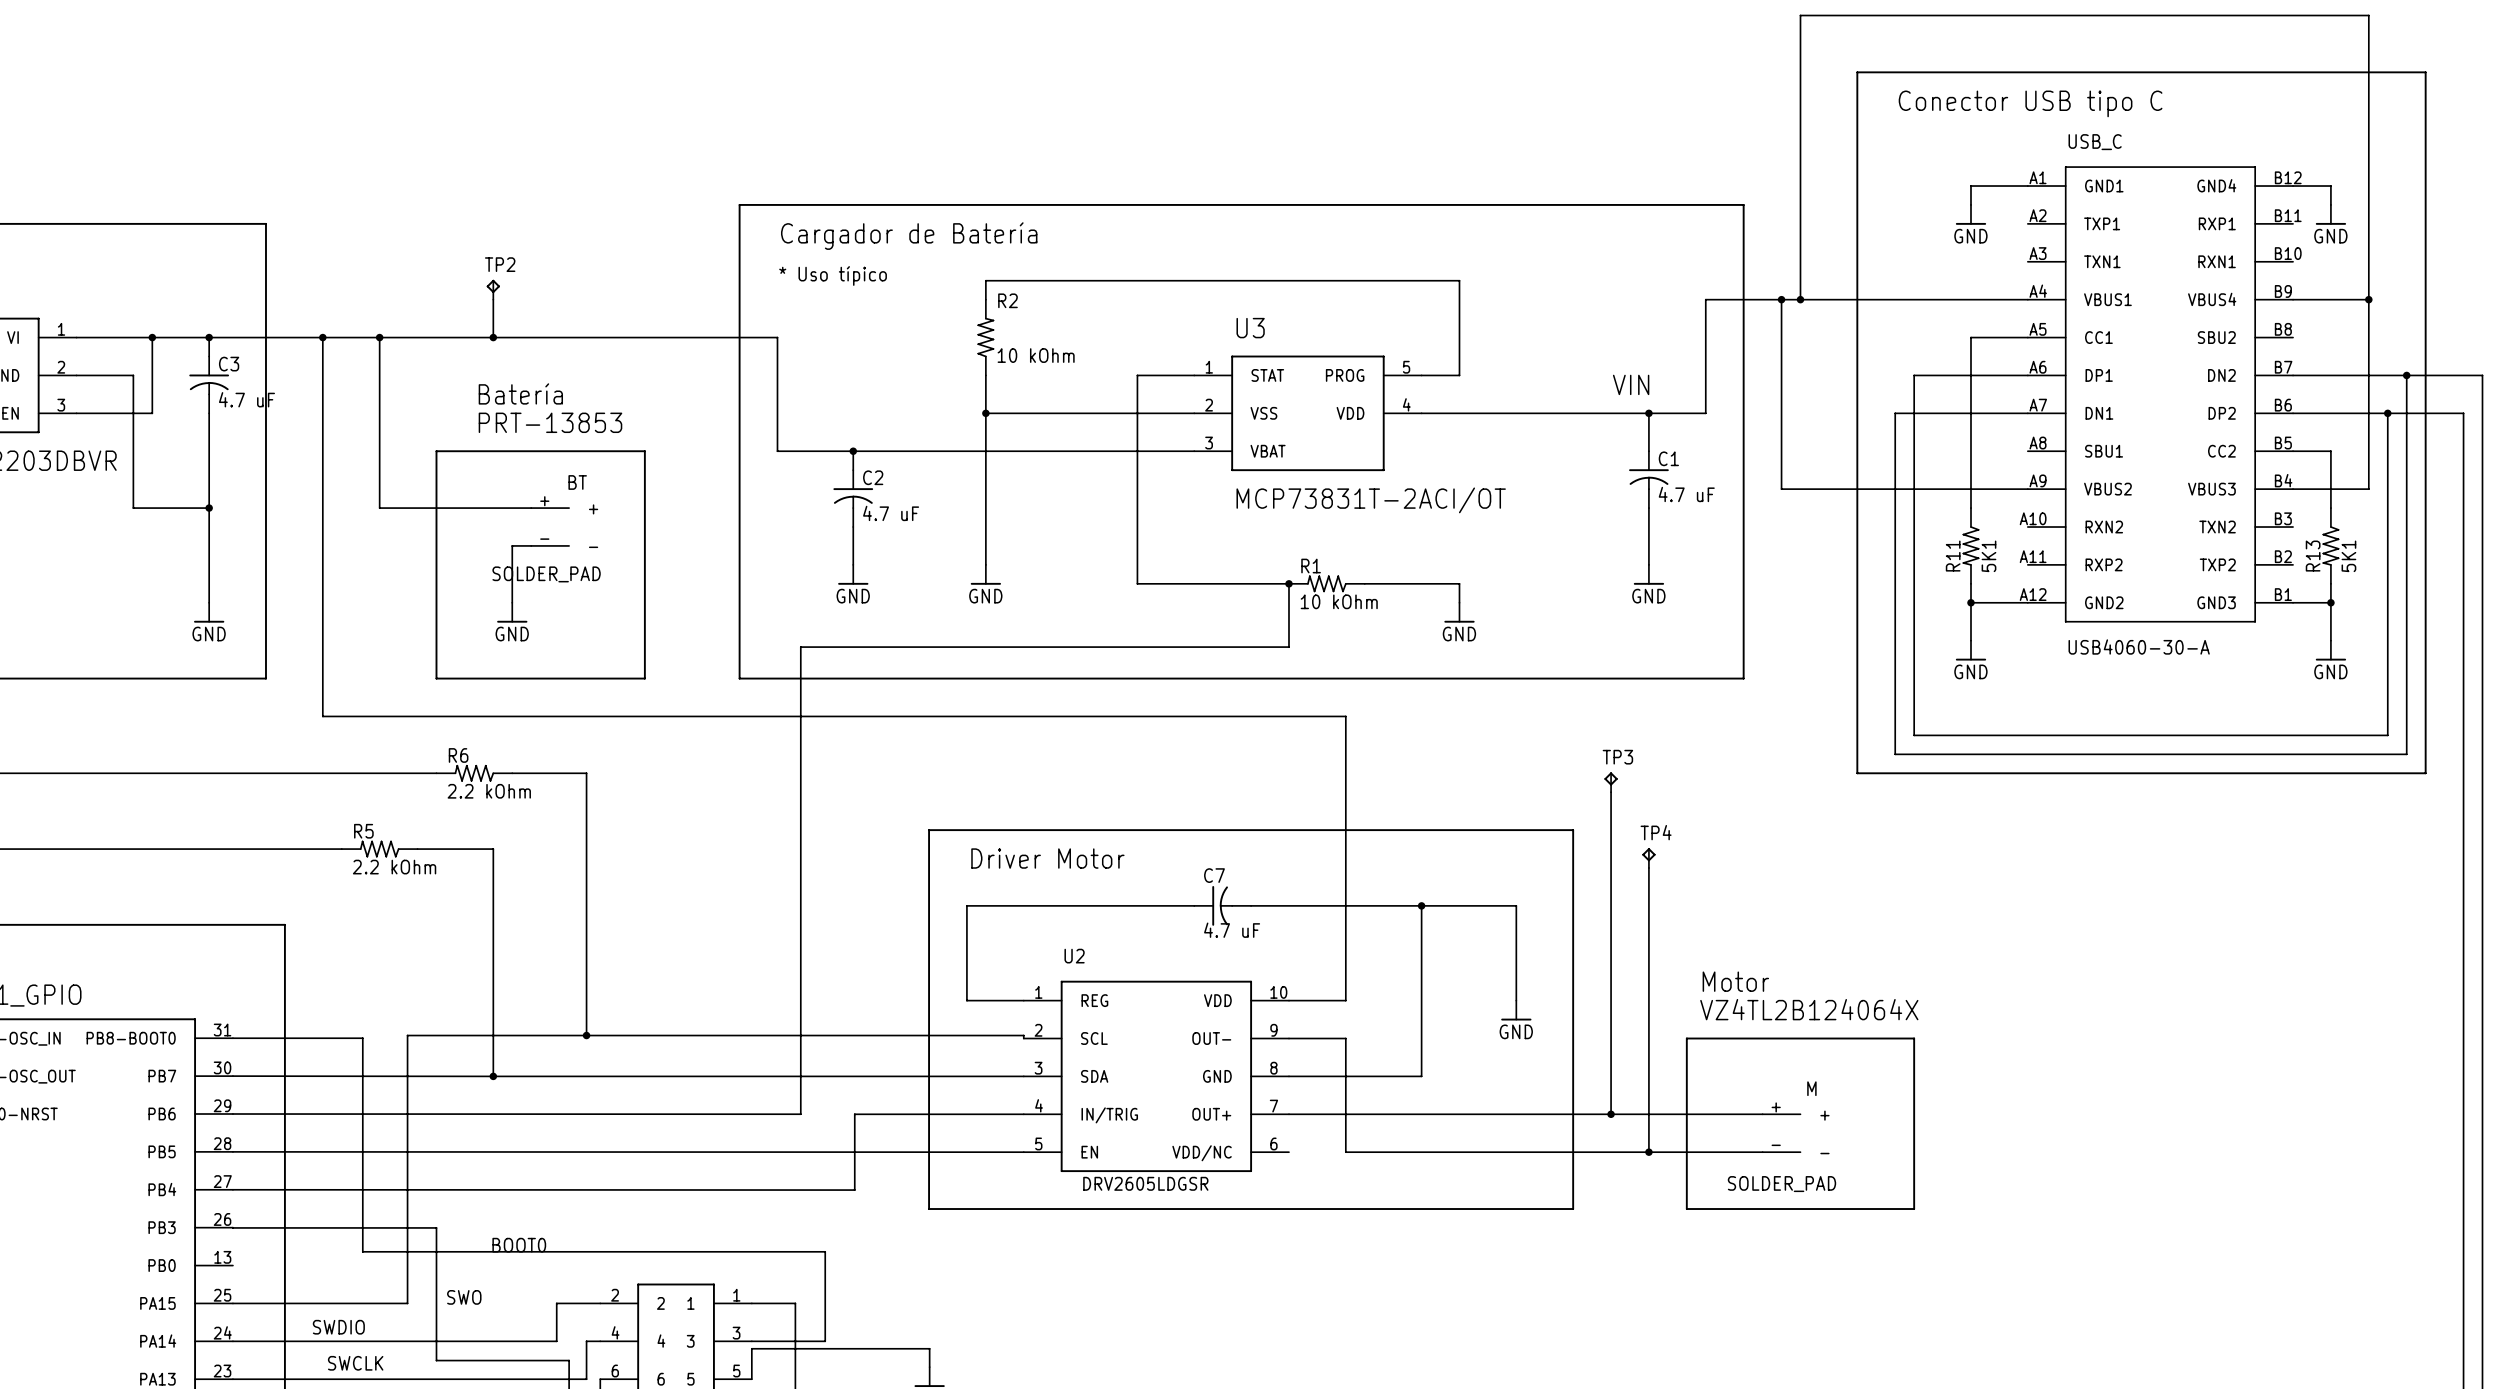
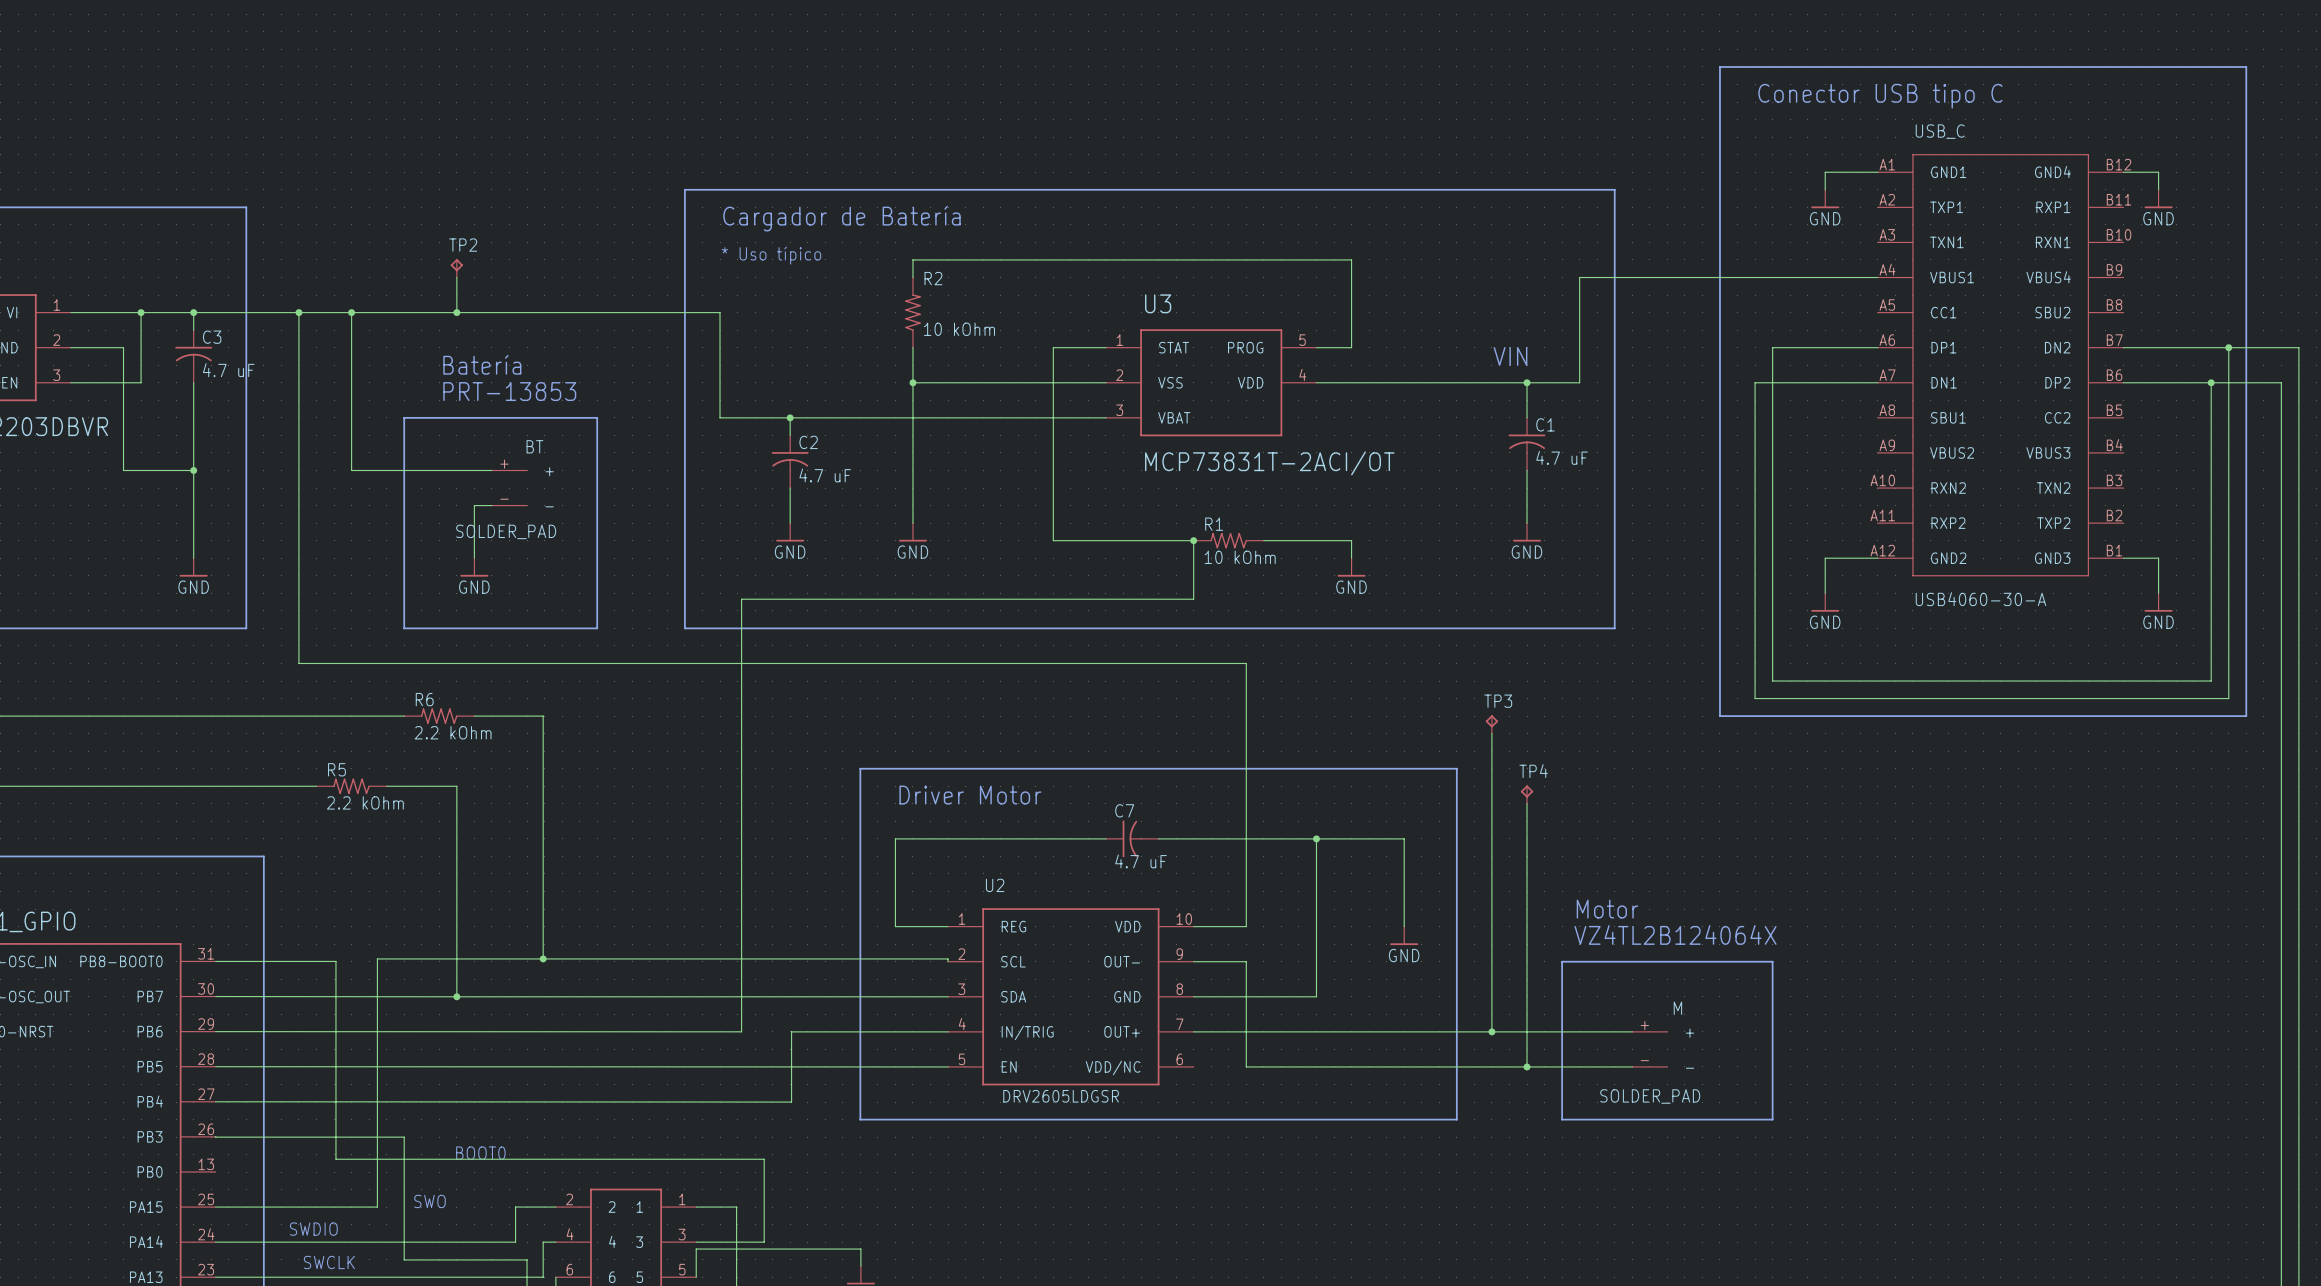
wire: (1781, 299) (1781, 489) (2027, 489) -> none
junction: (1781, 299) -> none
wire: (1800, 299) (1800, 15) (2368, 15) (2368, 489) (2293, 489) -> none
junction: (1800, 299) -> none
wire: (2293, 299) (2368, 299) -> none
junction: (2368, 299) -> none
wire: (2027, 337) (1970, 337) (1970, 508) -> none
wire: (2293, 451) (2330, 451) (2330, 508) -> none
R11: 5K1 (1970, 545) -> none
R13: 5K1 (2330, 545) -> none
wire: (1970, 583) (1970, 602) -> none
wire: (2330, 583) (2330, 602) -> none
junction: (1970, 602) -> none
junction: (2330, 602) -> none

